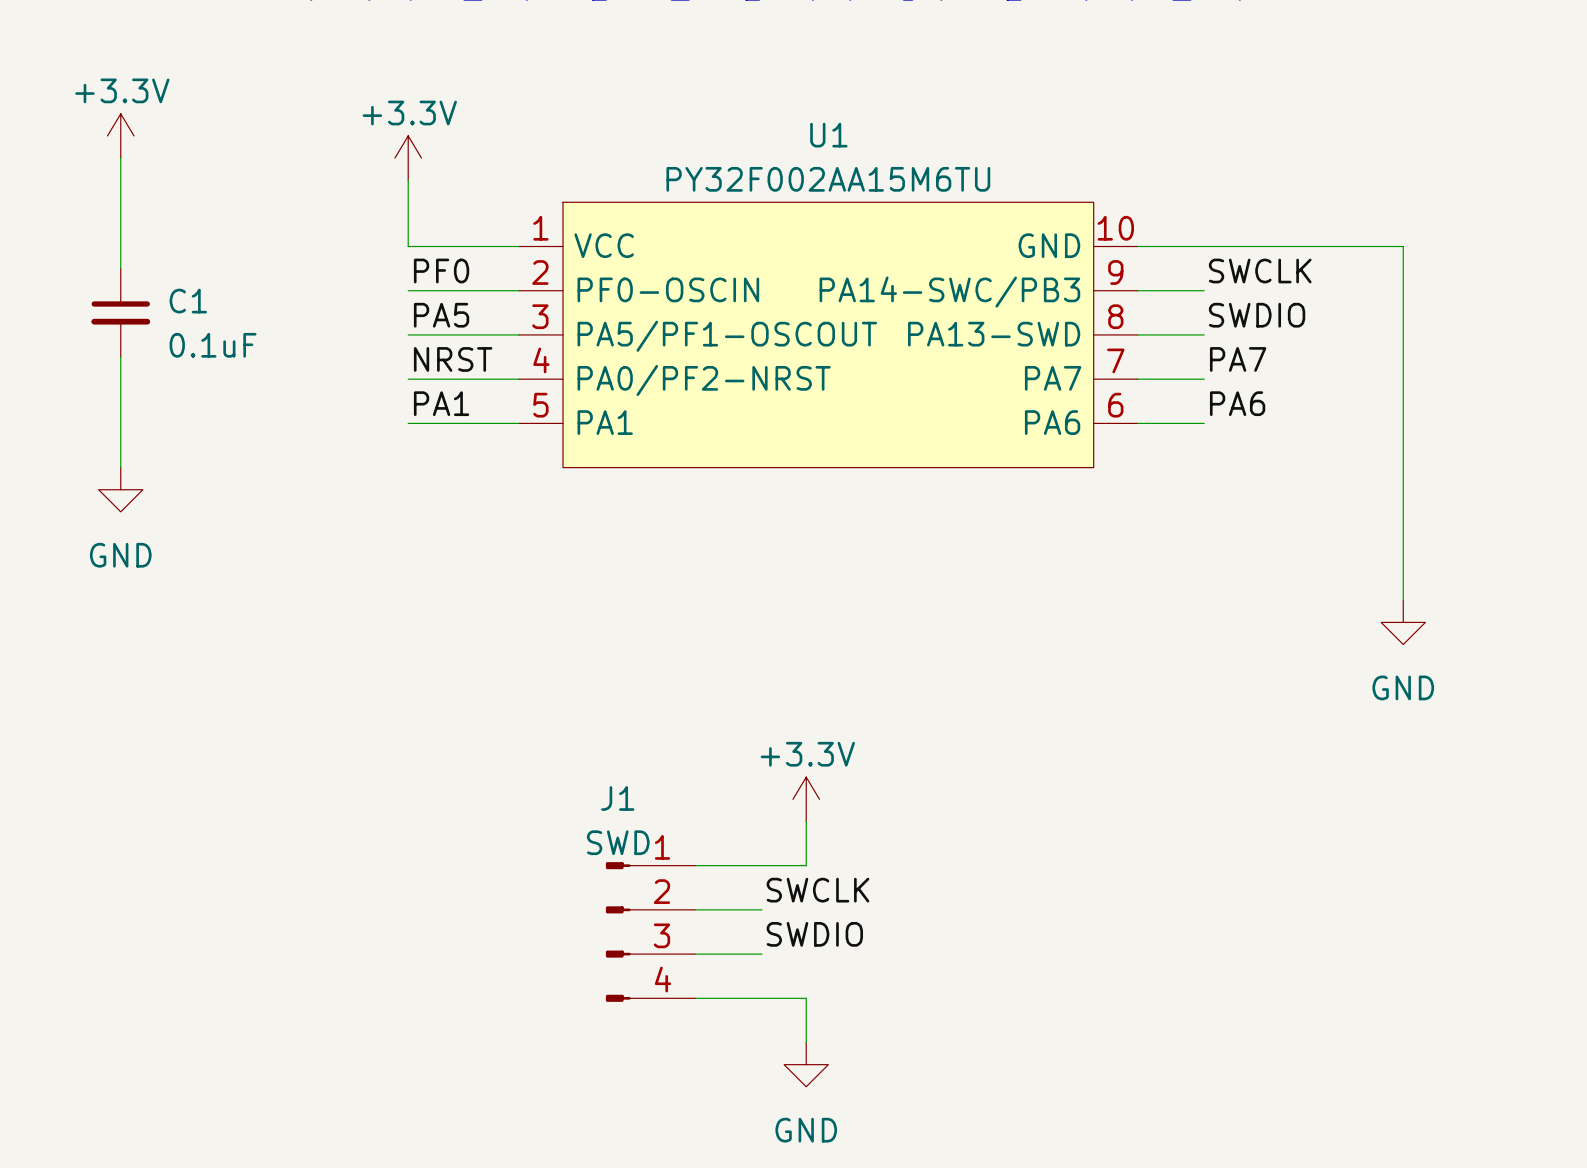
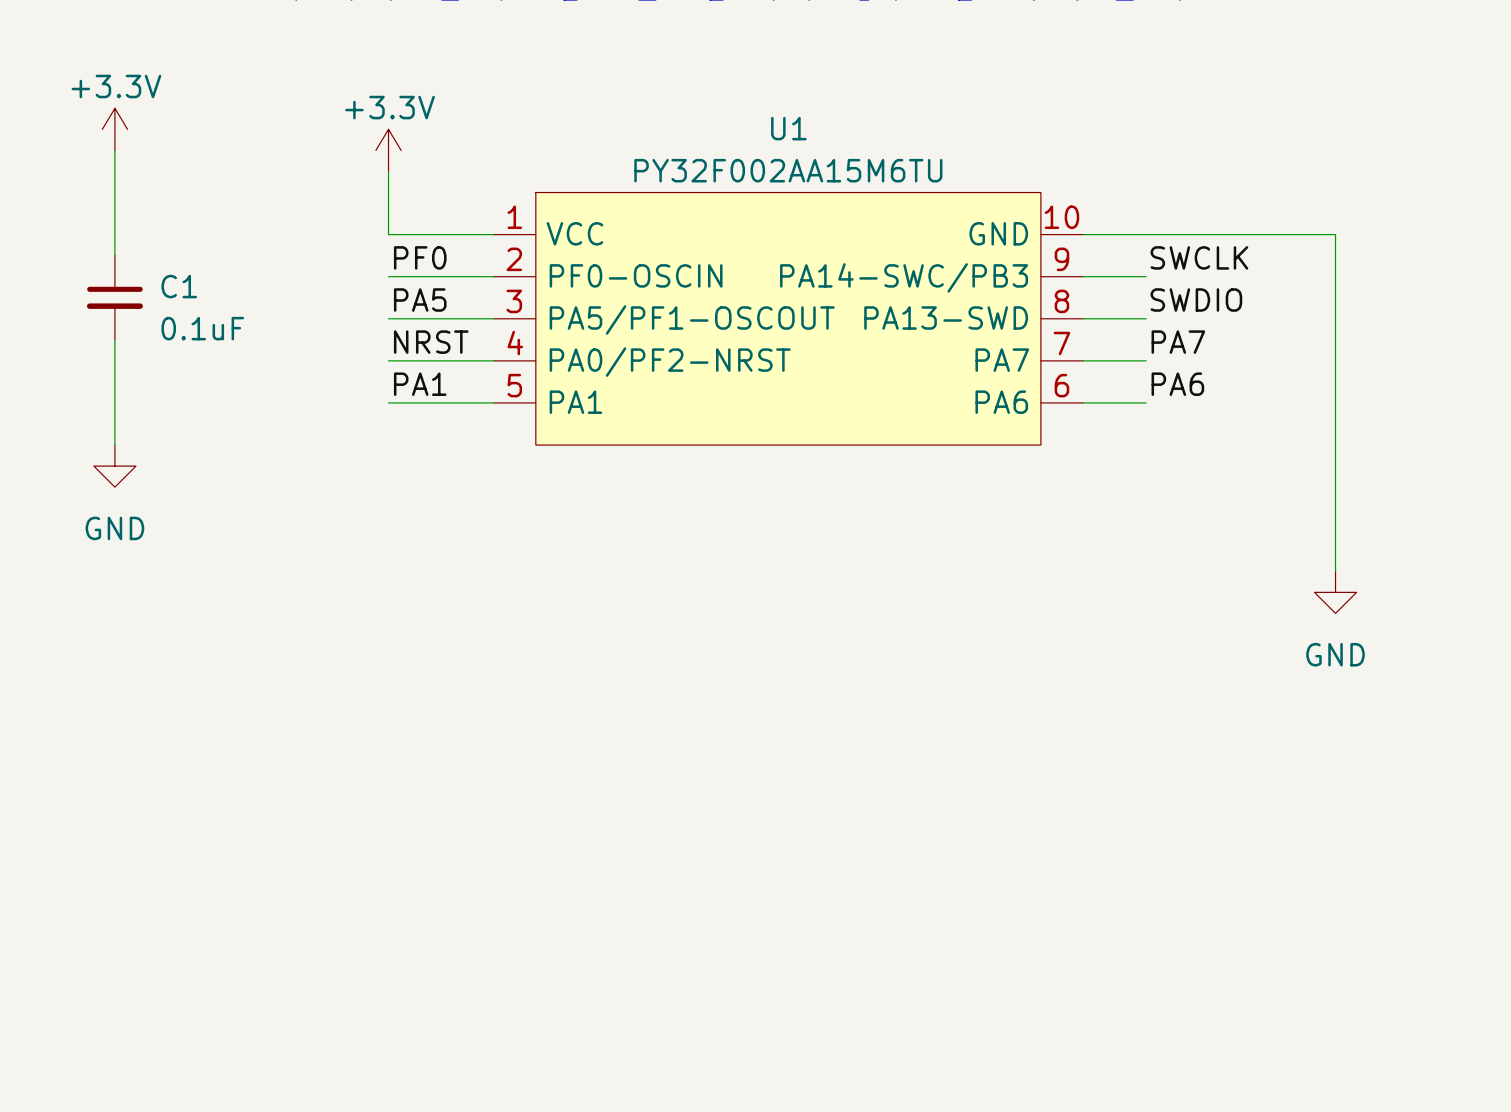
power symbol: +3.3V (806, 799) -> none
wire: (806, 821) (806, 865) (695, 865) -> none
label: SWCLK (817, 890) -> none
wire: (695, 909) (762, 909) -> none
J1: SWD (650, 931) -> none
label: SWDIO (814, 934) -> none
wire: (695, 954) (762, 954) -> none
wire: (695, 998) (806, 998) (806, 1042) -> none
power symbol: GND (806, 1064) -> none

